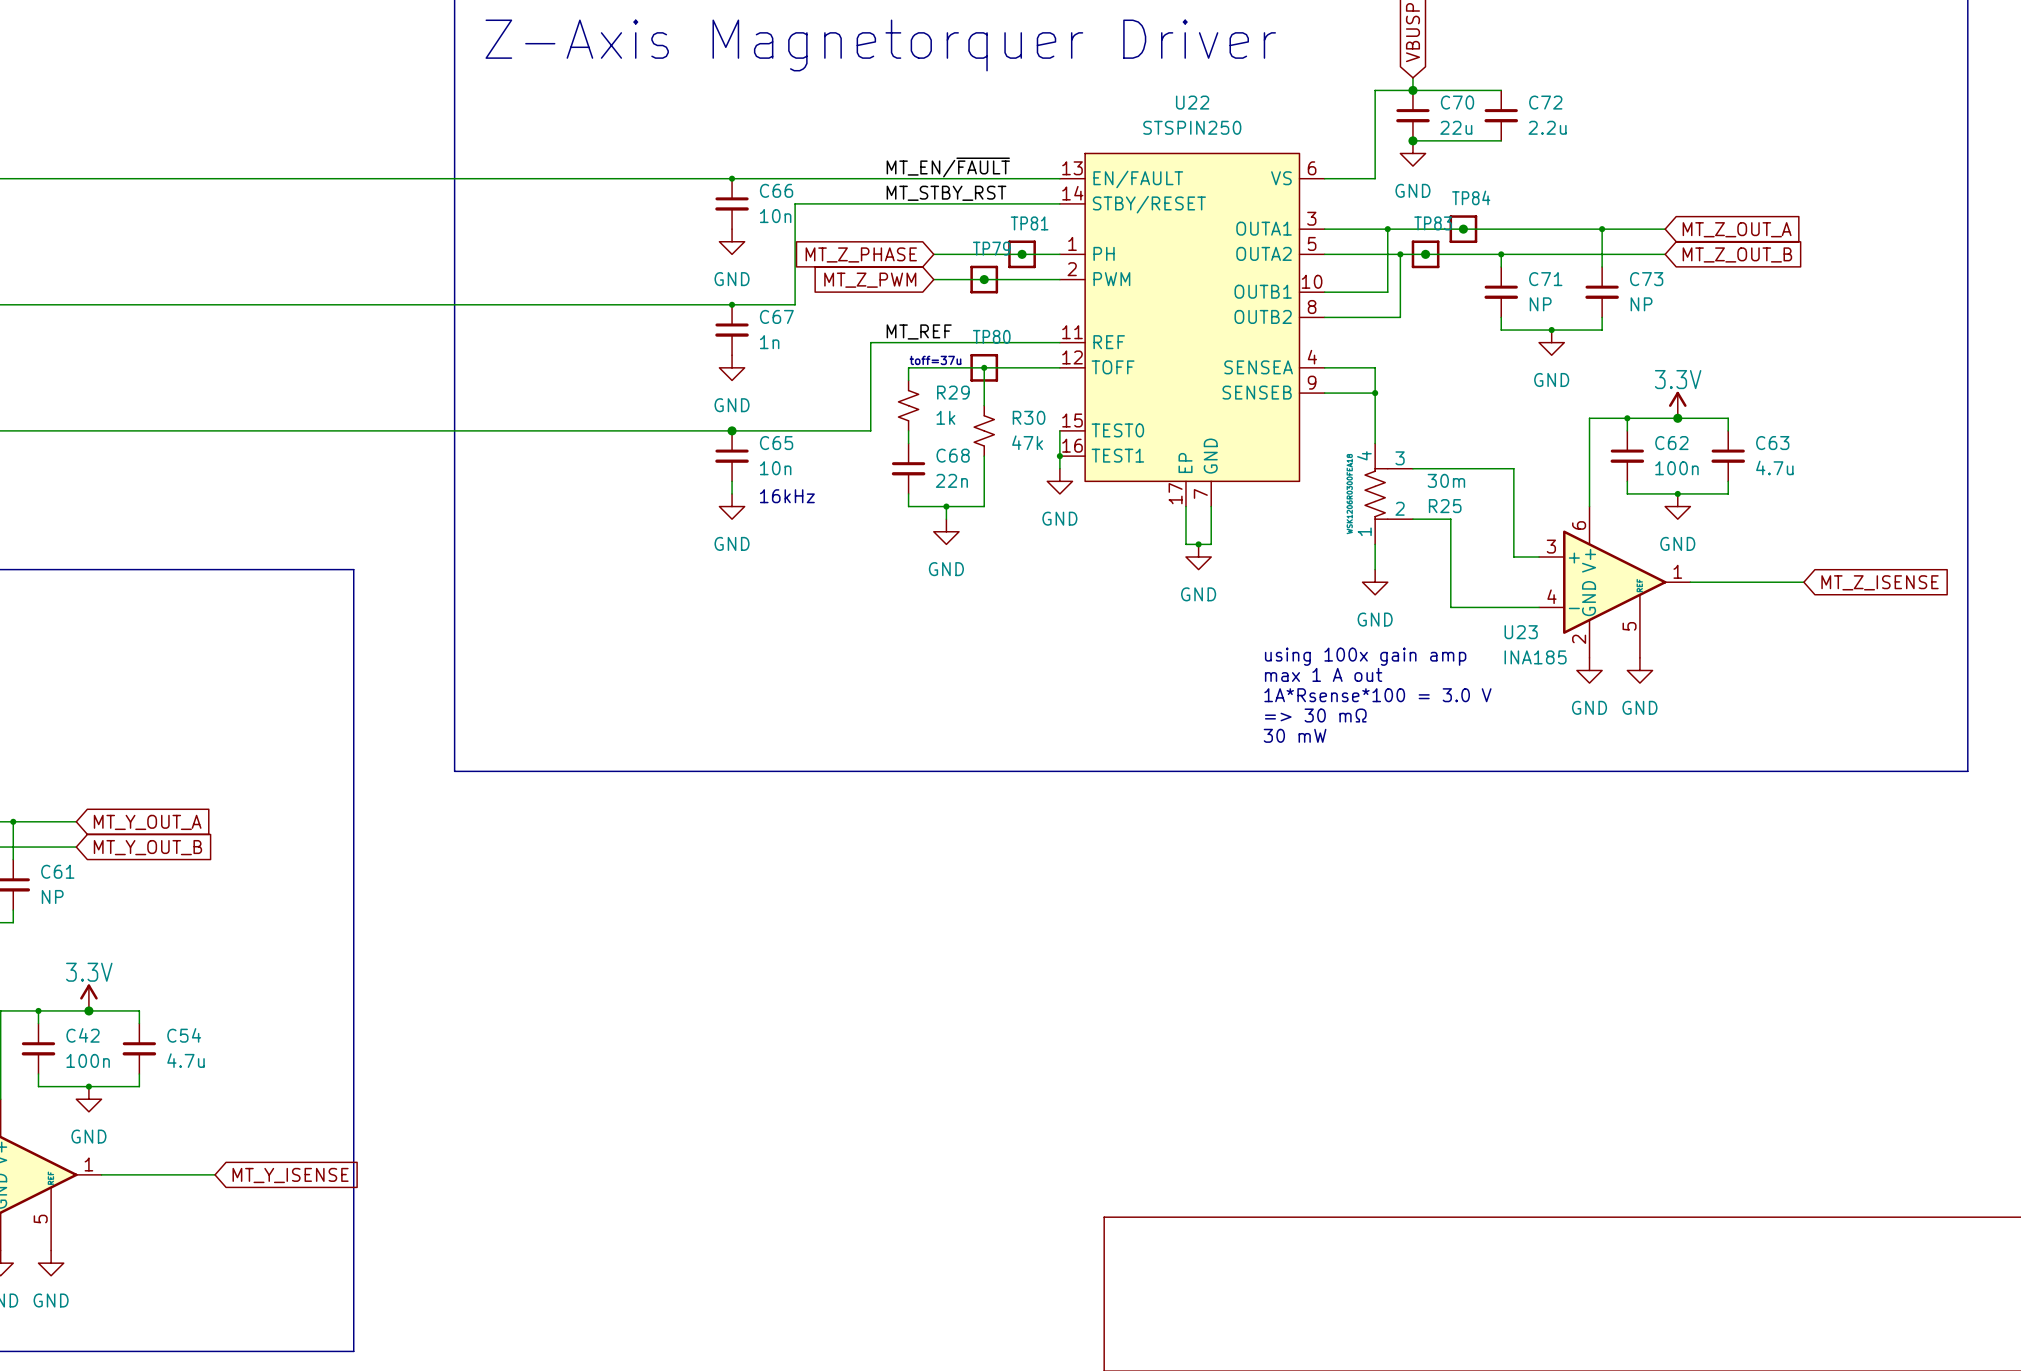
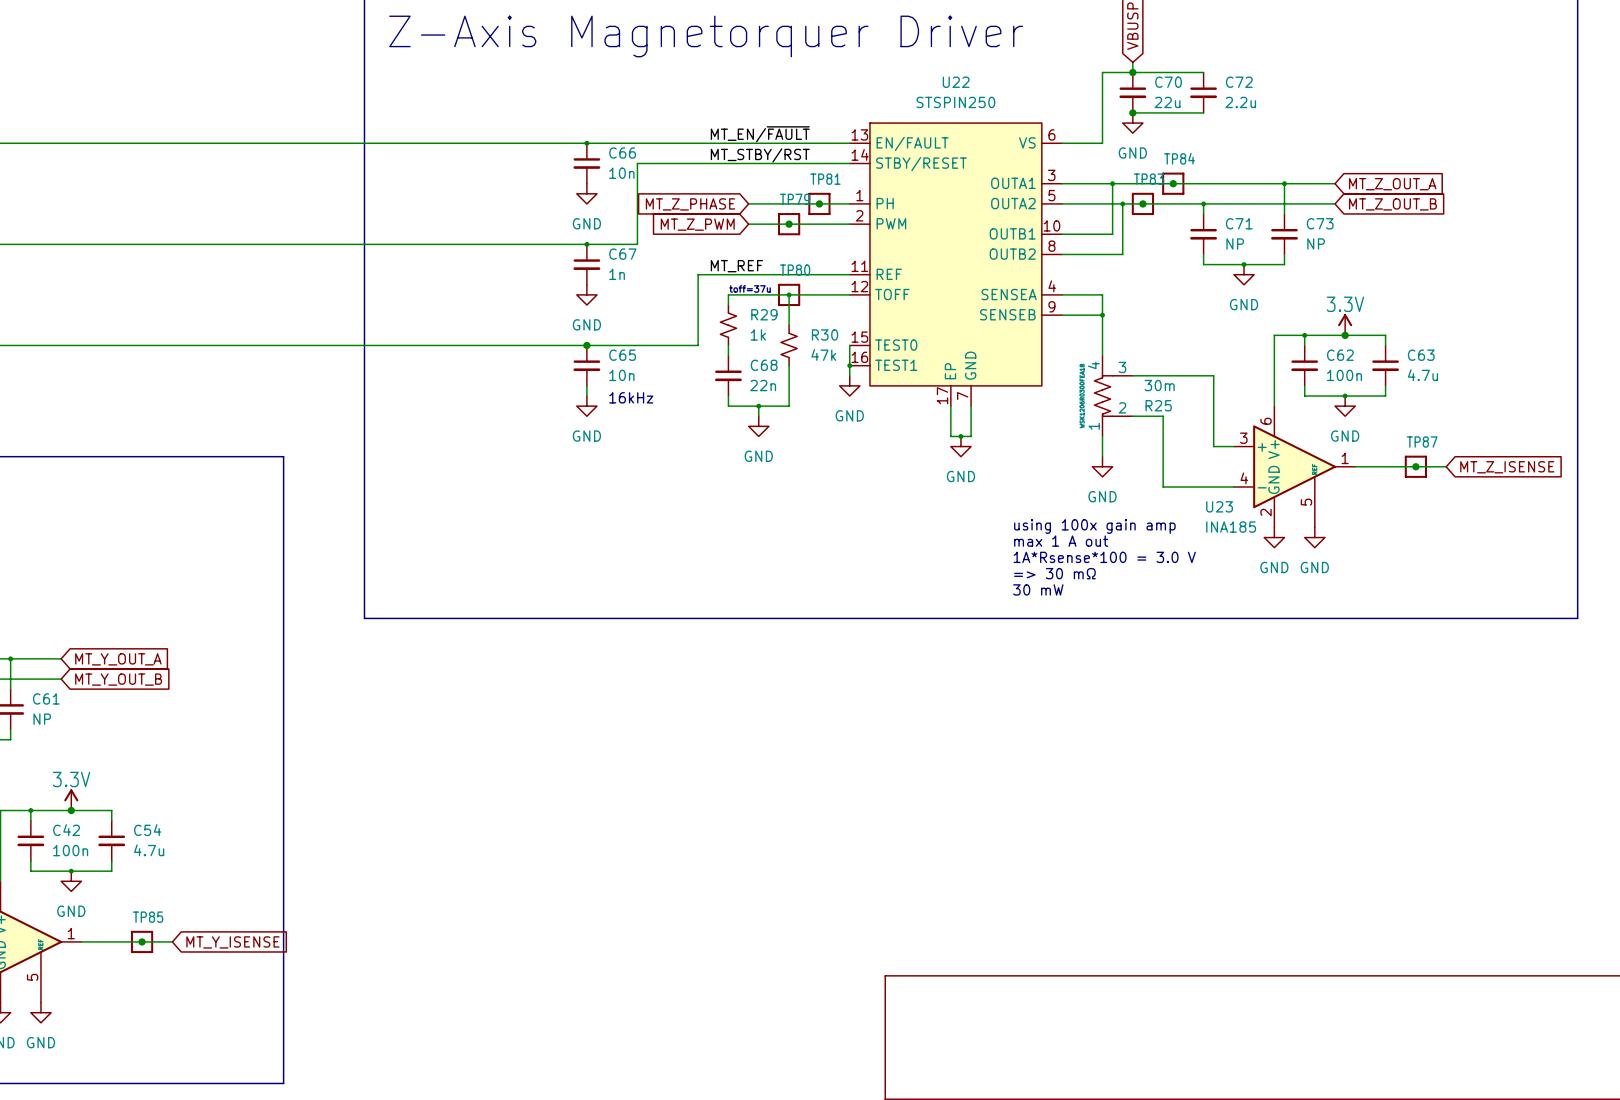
label: MT_STBY_RST (946, 193) -> MT_STBY/RST (760, 155)
junction: none -> (1415, 466)
TP87: none -> (1415, 466)
junction: none -> (142, 941)
TP85: none -> (142, 941)

